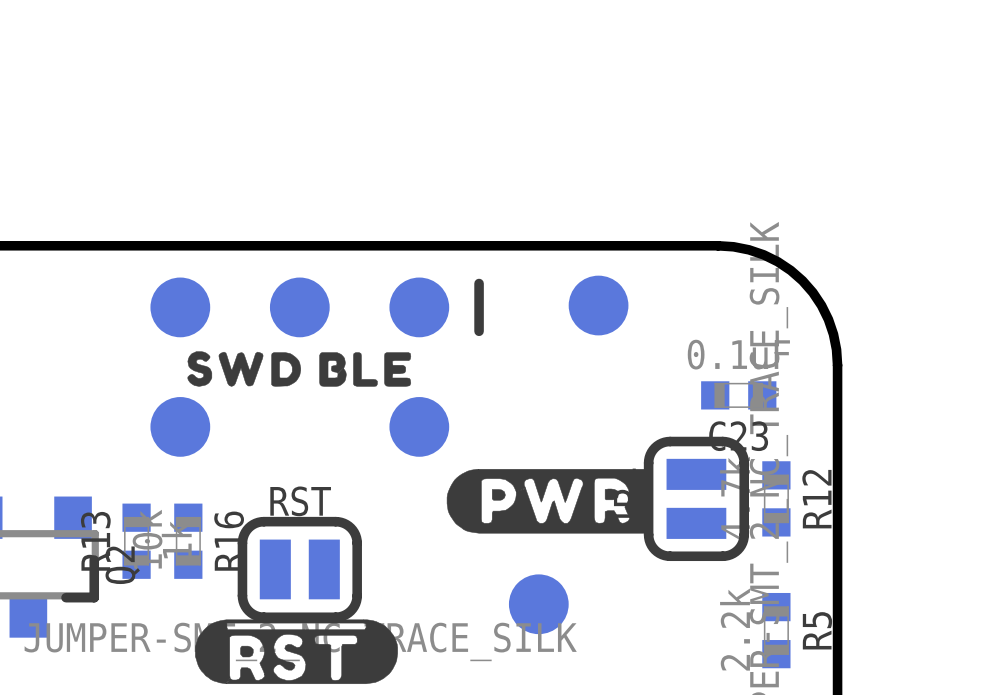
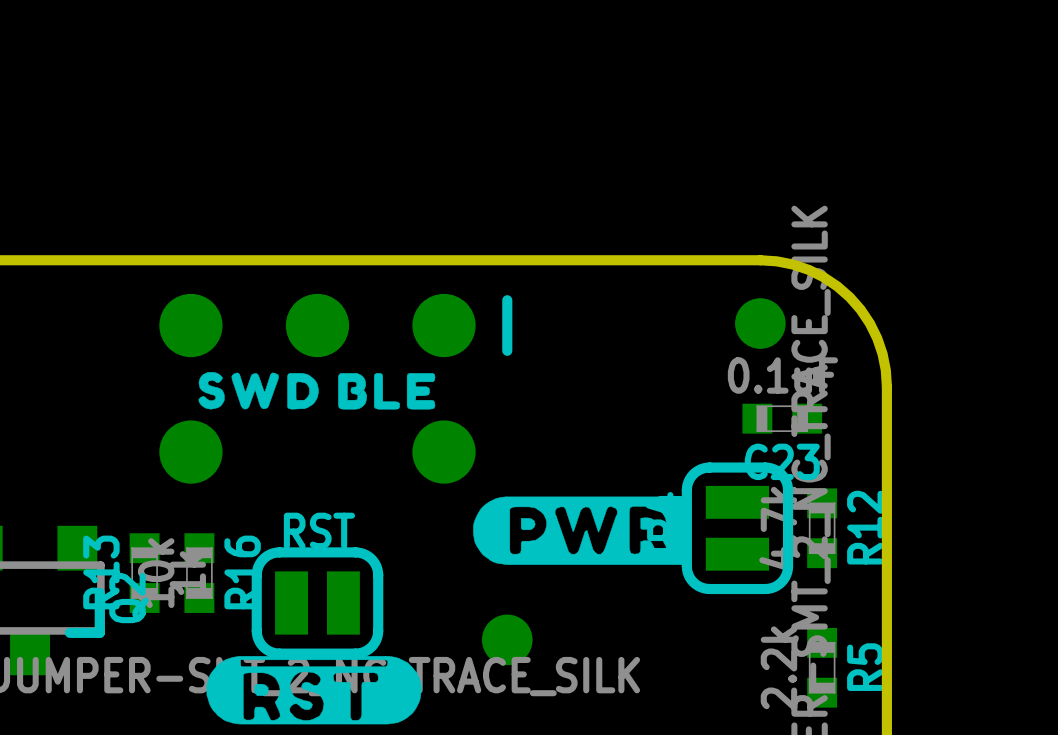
part: (598, 305) -> none
part: none -> (760, 323)
part: none -> (507, 639)
part: (538, 604) -> none

